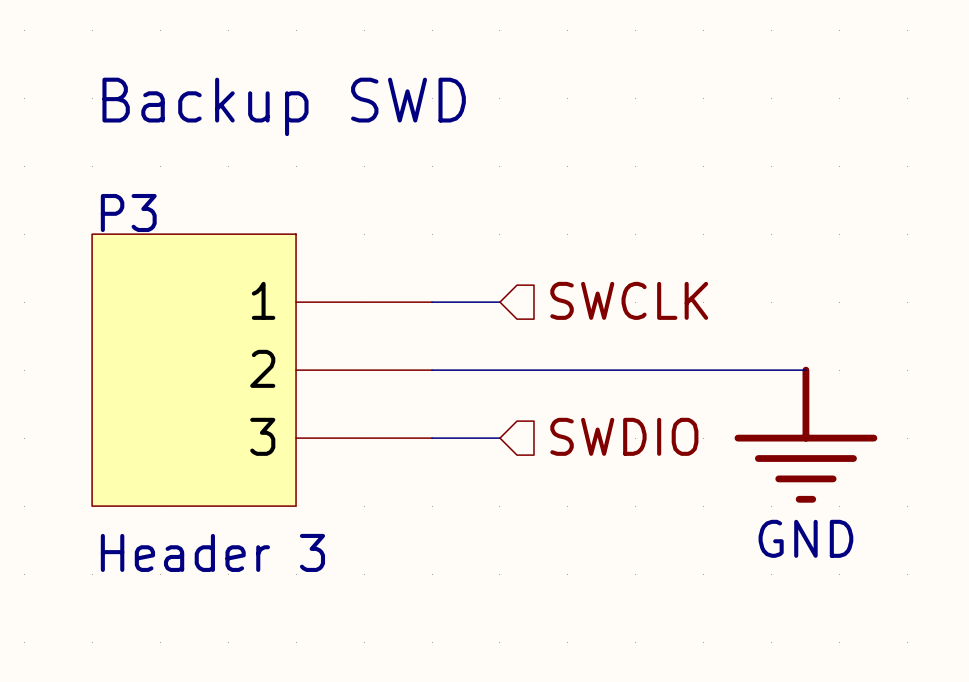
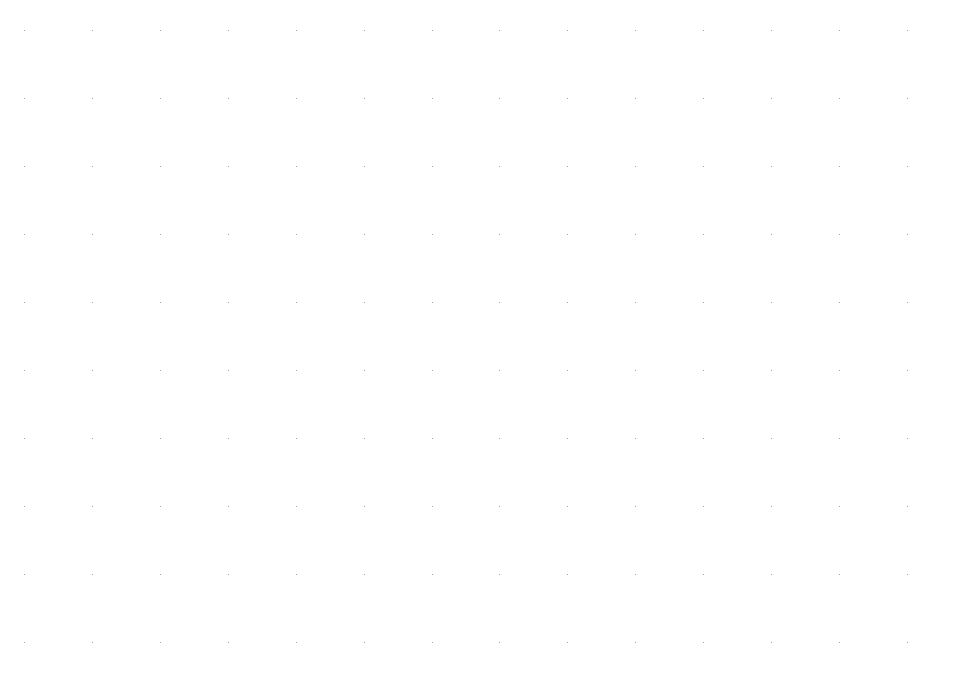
text: Backup SWD (284, 106) -> none
hierarchical label: SWCLK (629, 300) -> none
wire: (432, 302) (499, 302) -> none
P3: Header 3 (261, 370) -> none
wire: (432, 370) (805, 370) -> none
power symbol: GND (805, 434) -> none
hierarchical label: SWDIO (624, 436) -> none
wire: (432, 438) (499, 438) -> none

